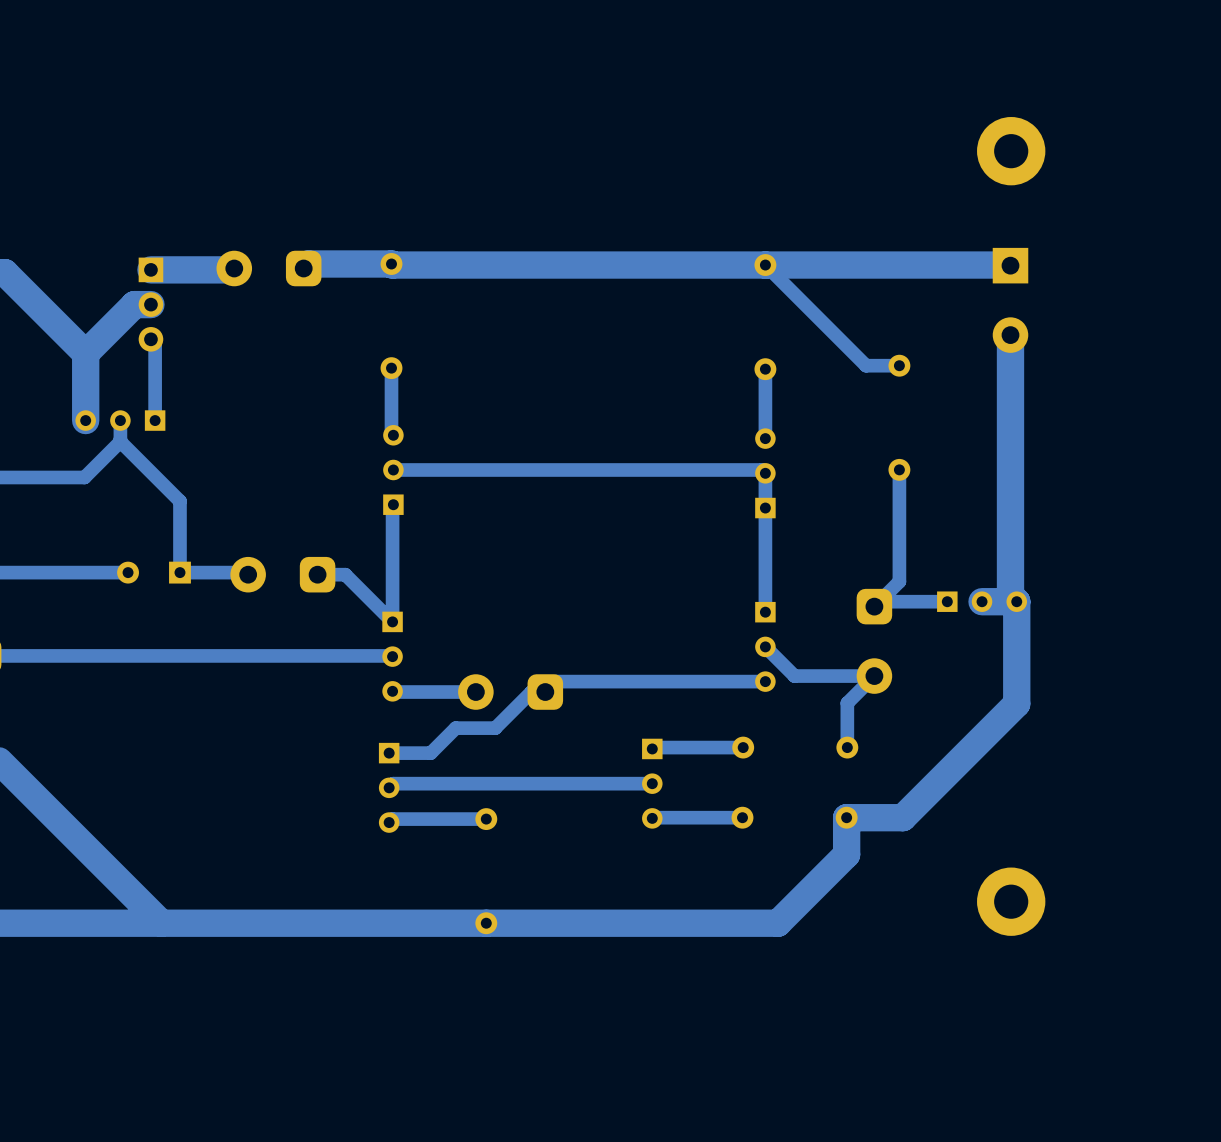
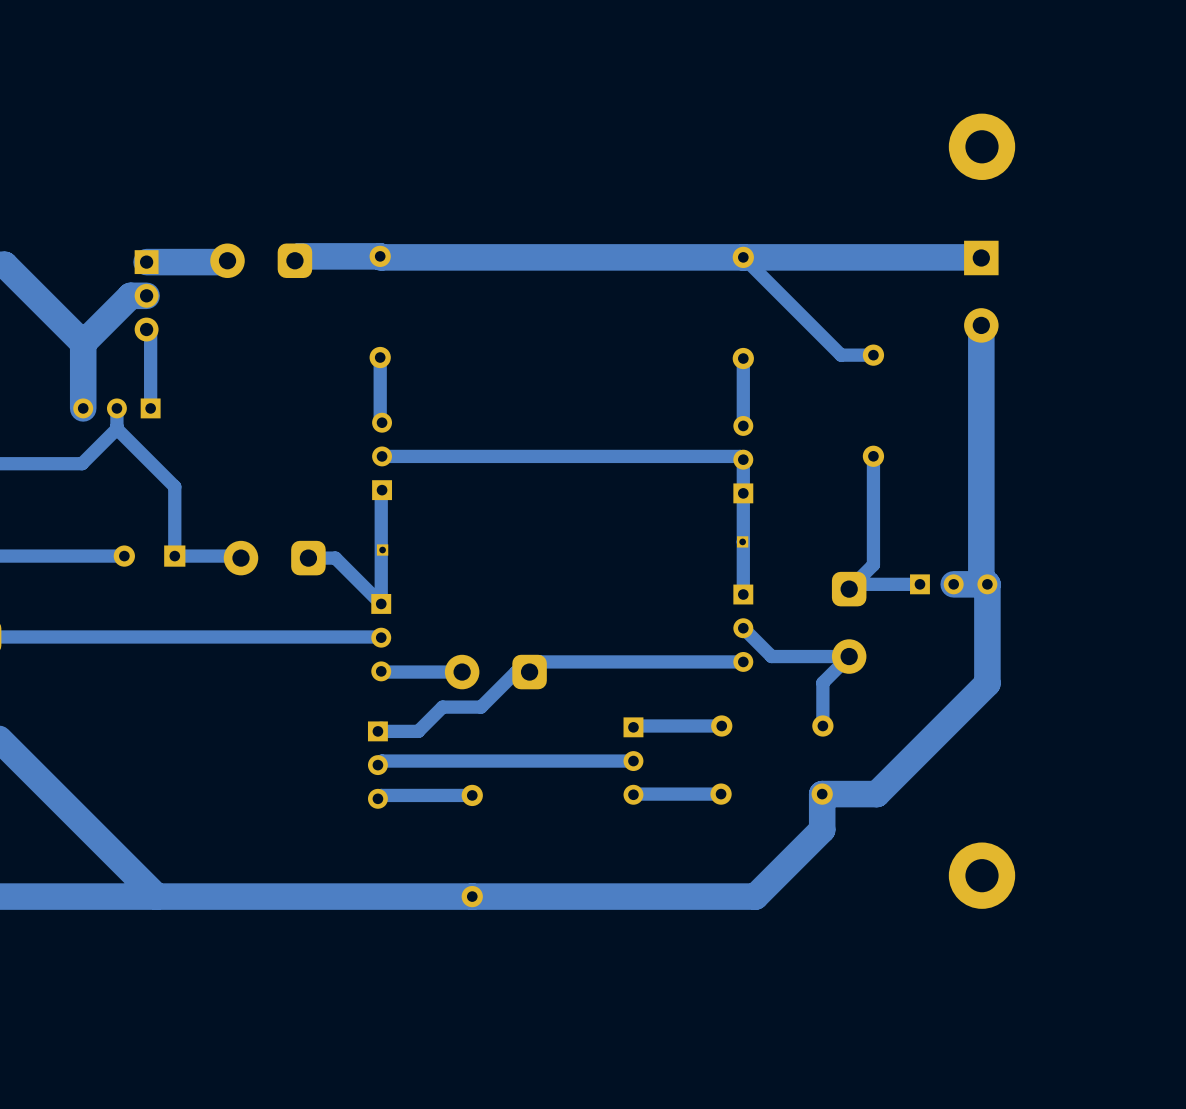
part: none -> (742, 541)
part: none -> (382, 550)

